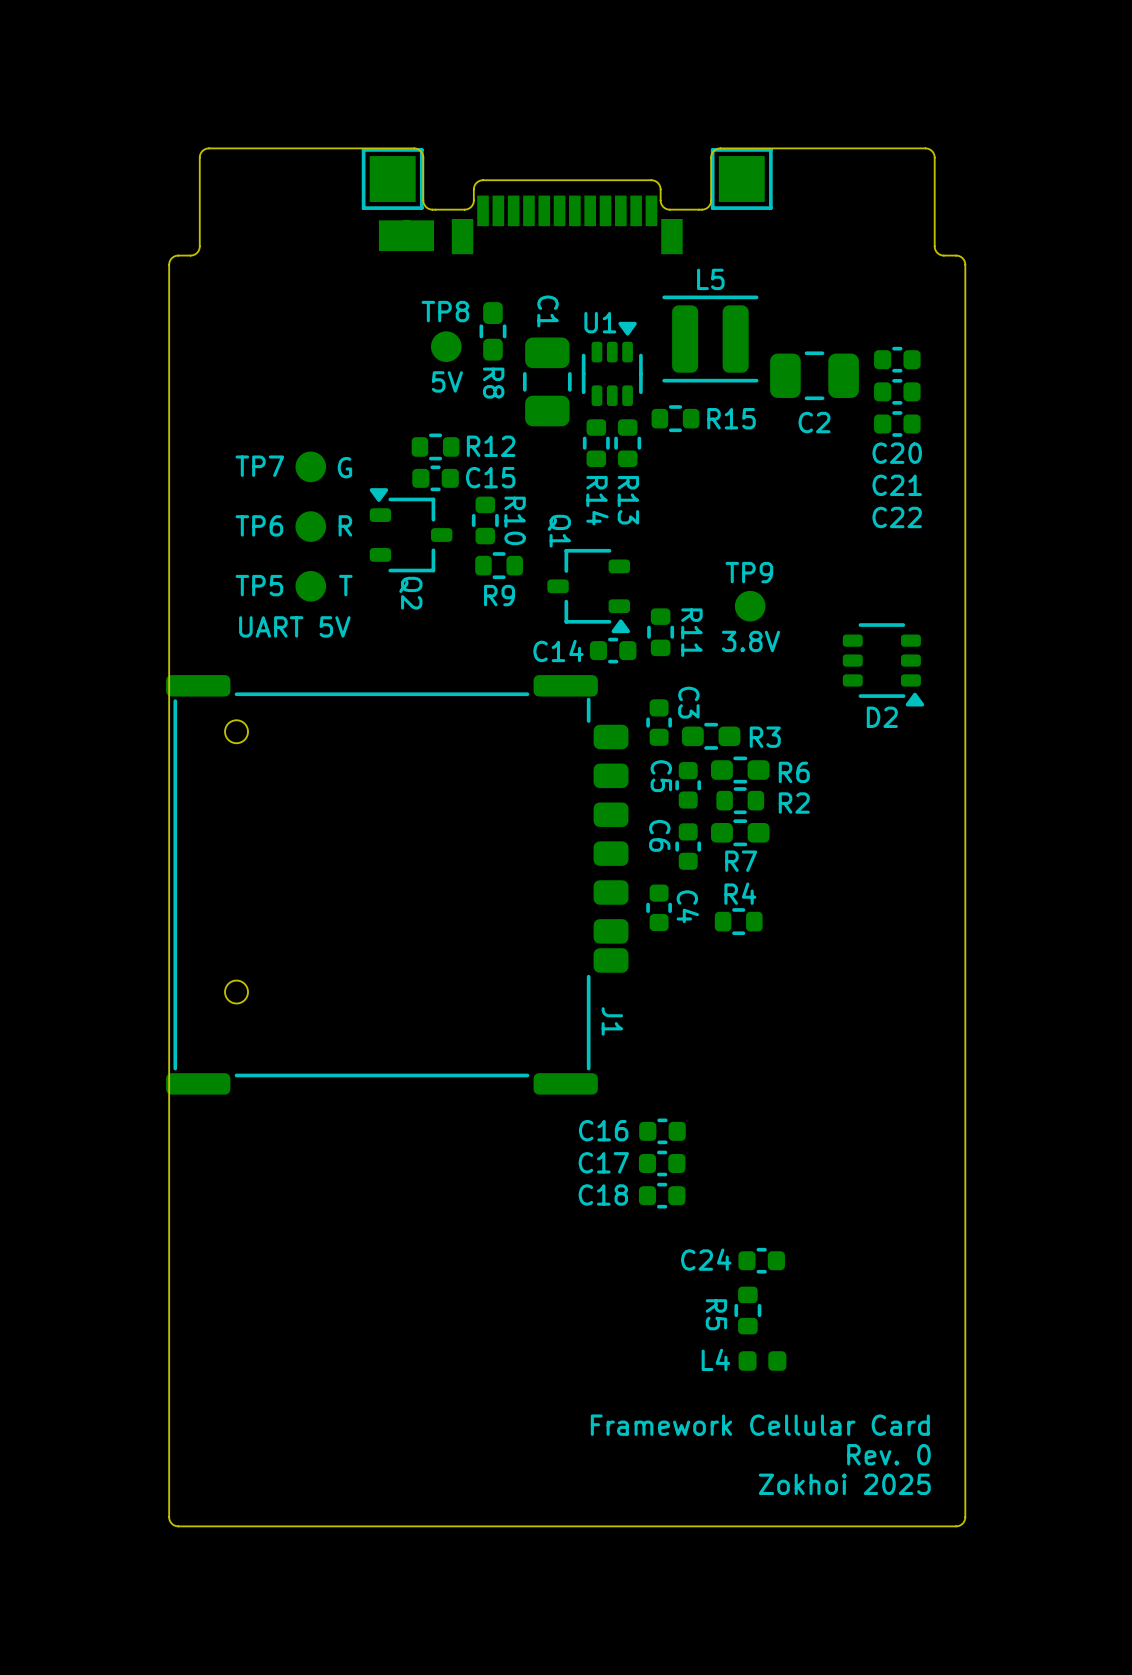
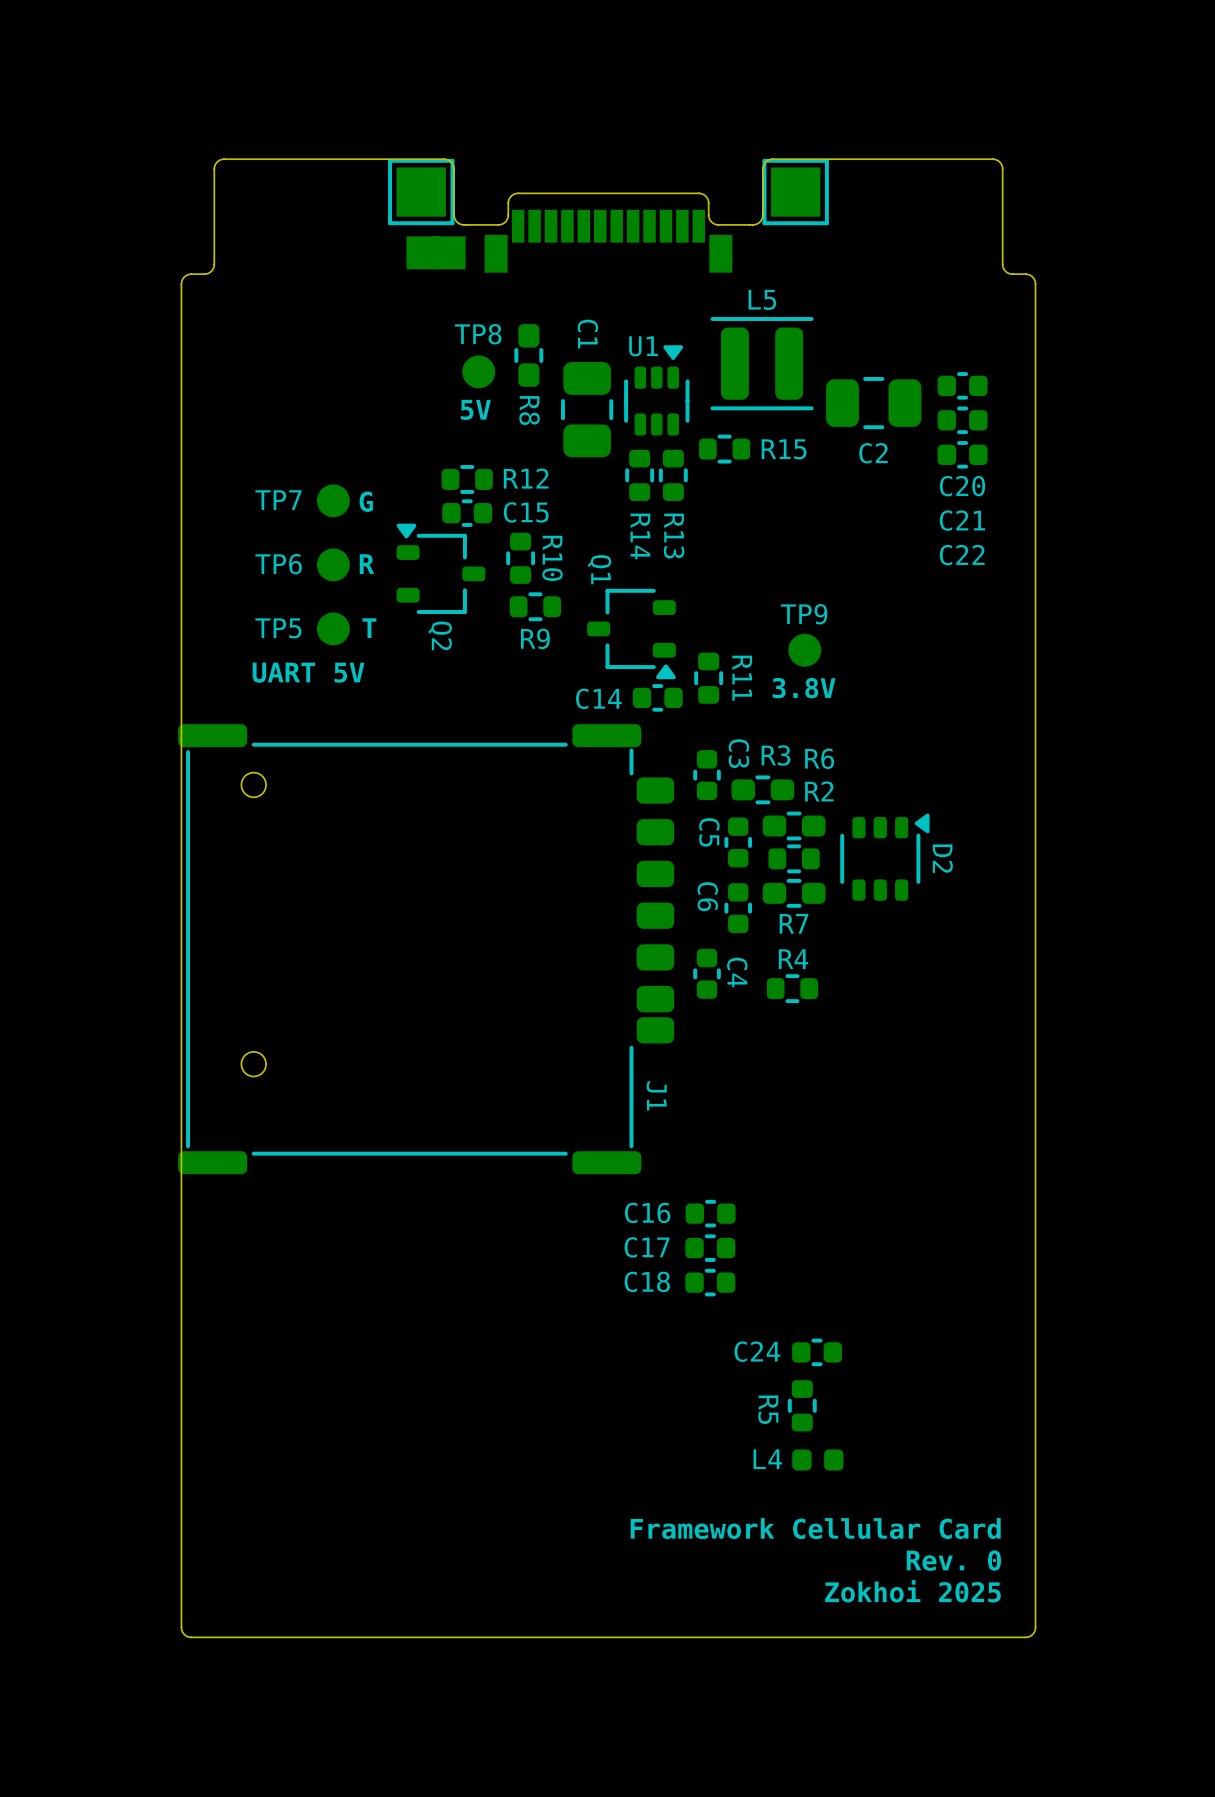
D2 rotation: 0° (883, 664) -> 90° counterclockwise (884, 857)
D2 position: (883, 664) -> (884, 857)
R3 name position: R3 (765, 737) -> R3 (775, 755)
R6 name position: R6 (794, 772) -> R6 (819, 758)
R2 name position: R2 (794, 803) -> R2 (819, 791)

